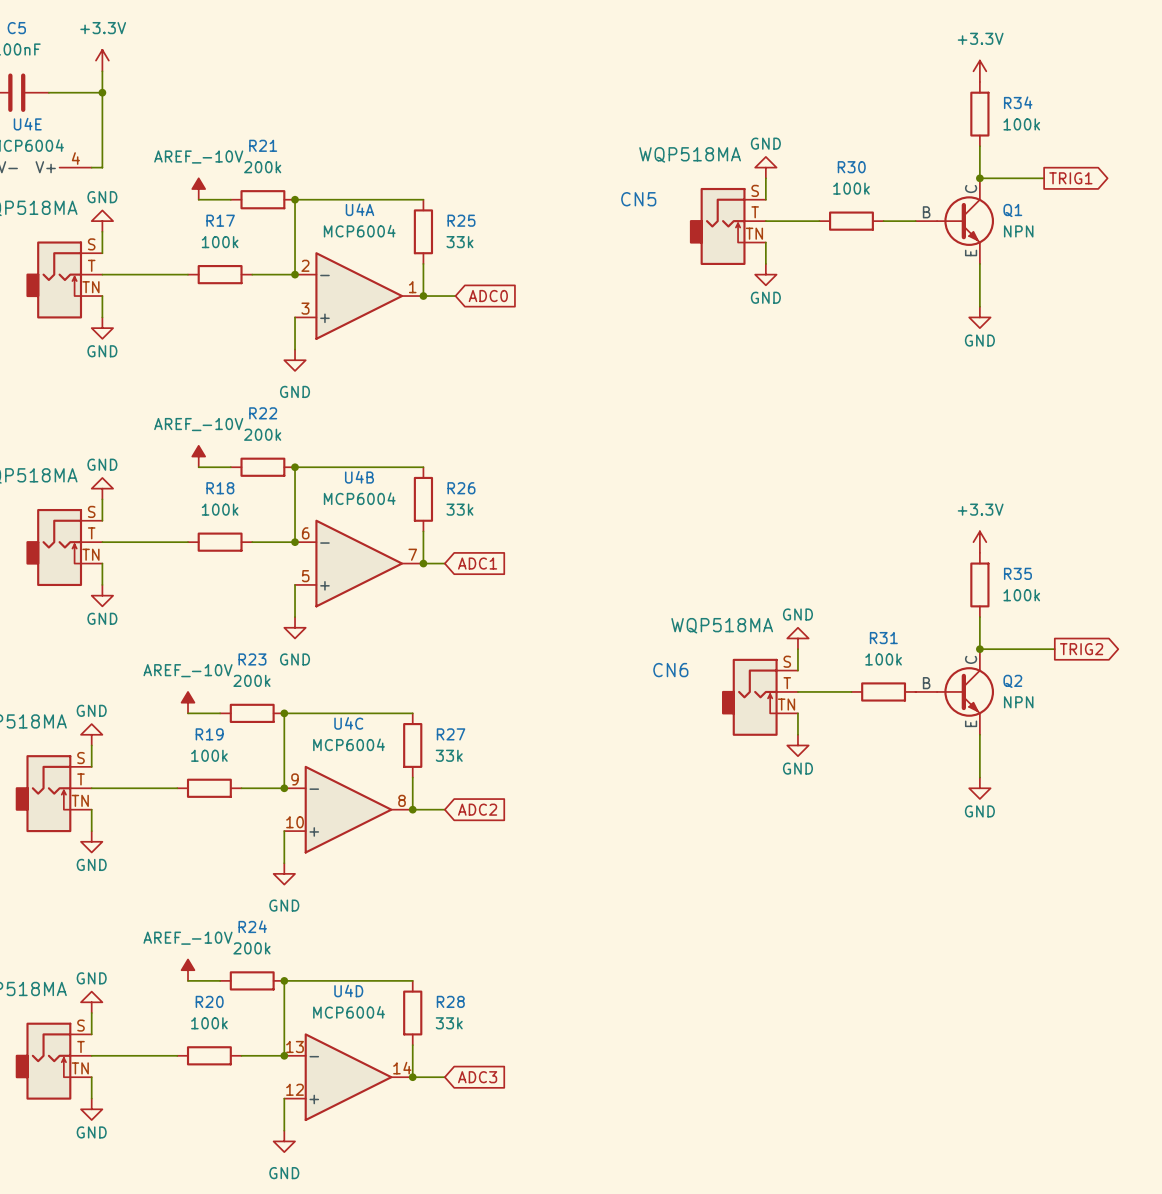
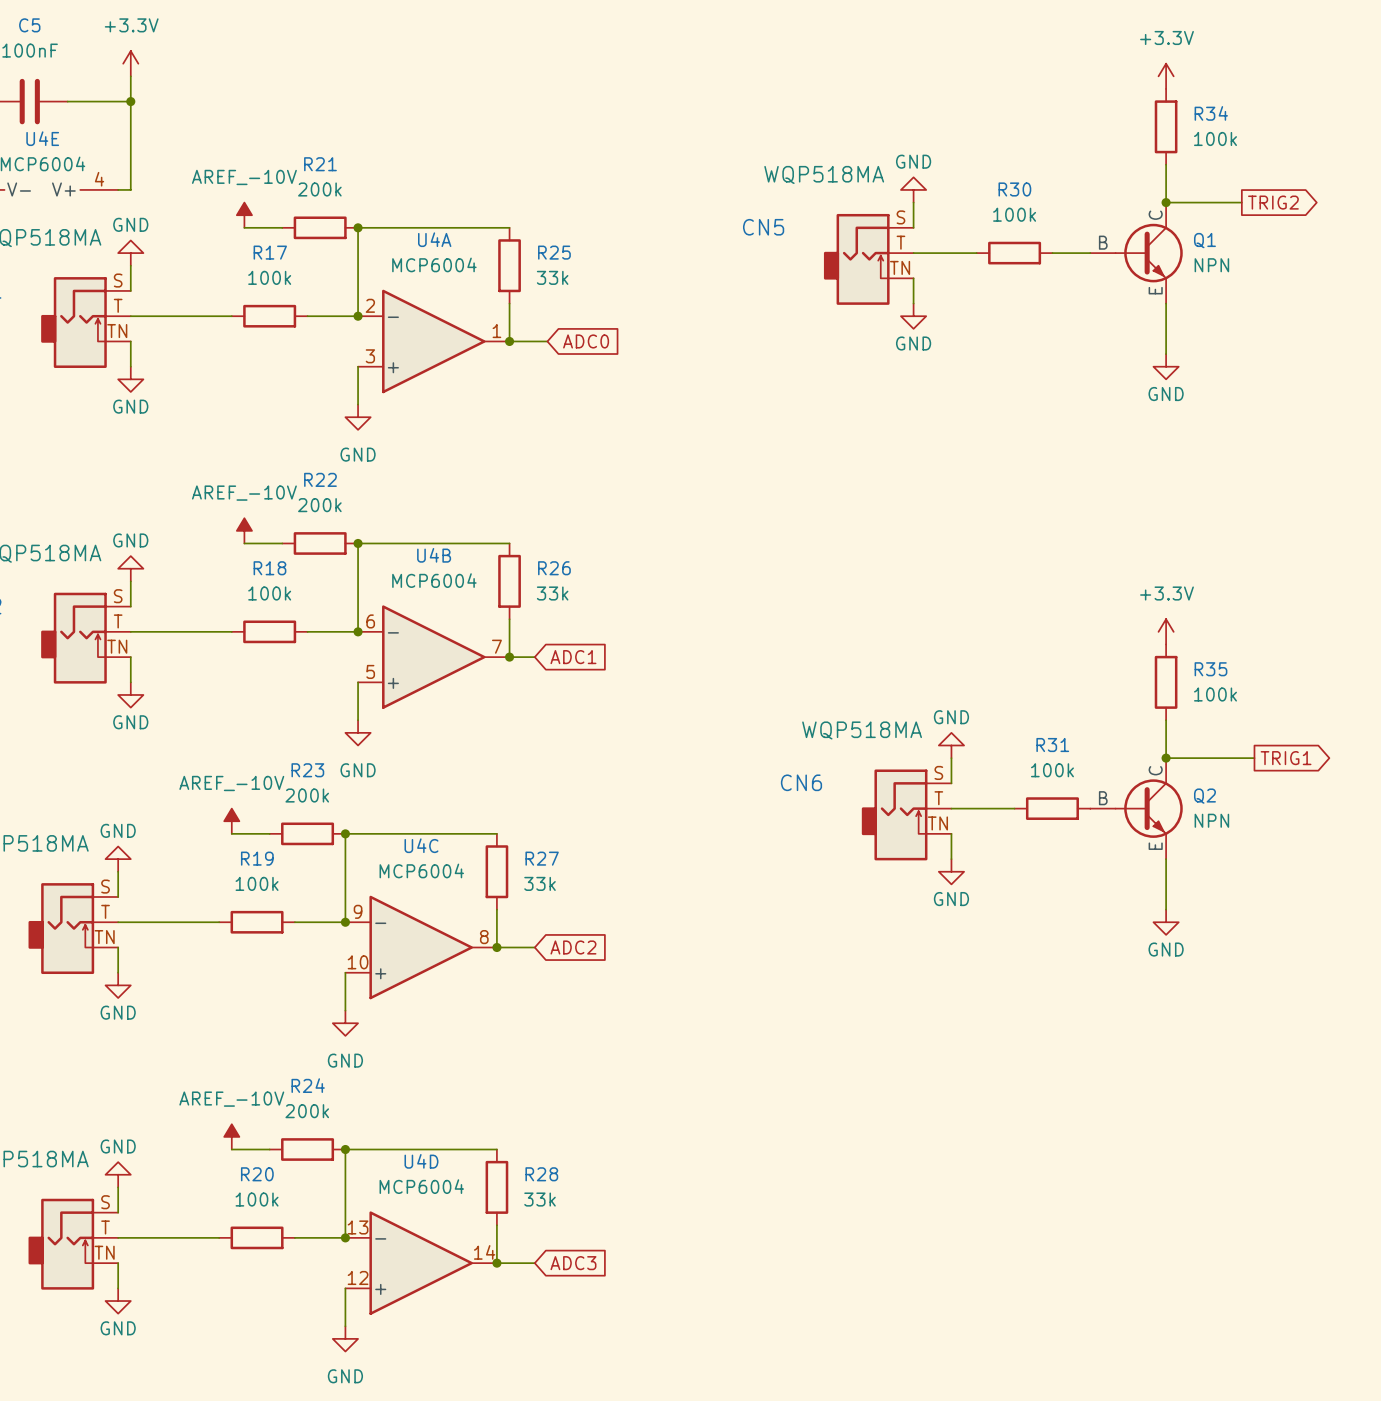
global label: TRIG1 (1070, 178) -> TRIG2 (1273, 202)
global label: TRIG2 (1081, 649) -> TRIG1 (1286, 758)

